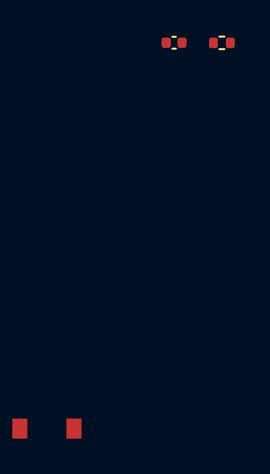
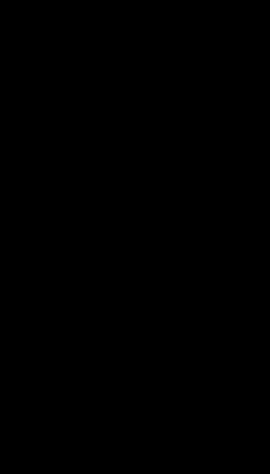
part: (174, 42) -> none
part: (221, 42) -> none
part: (46, 428) -> none

